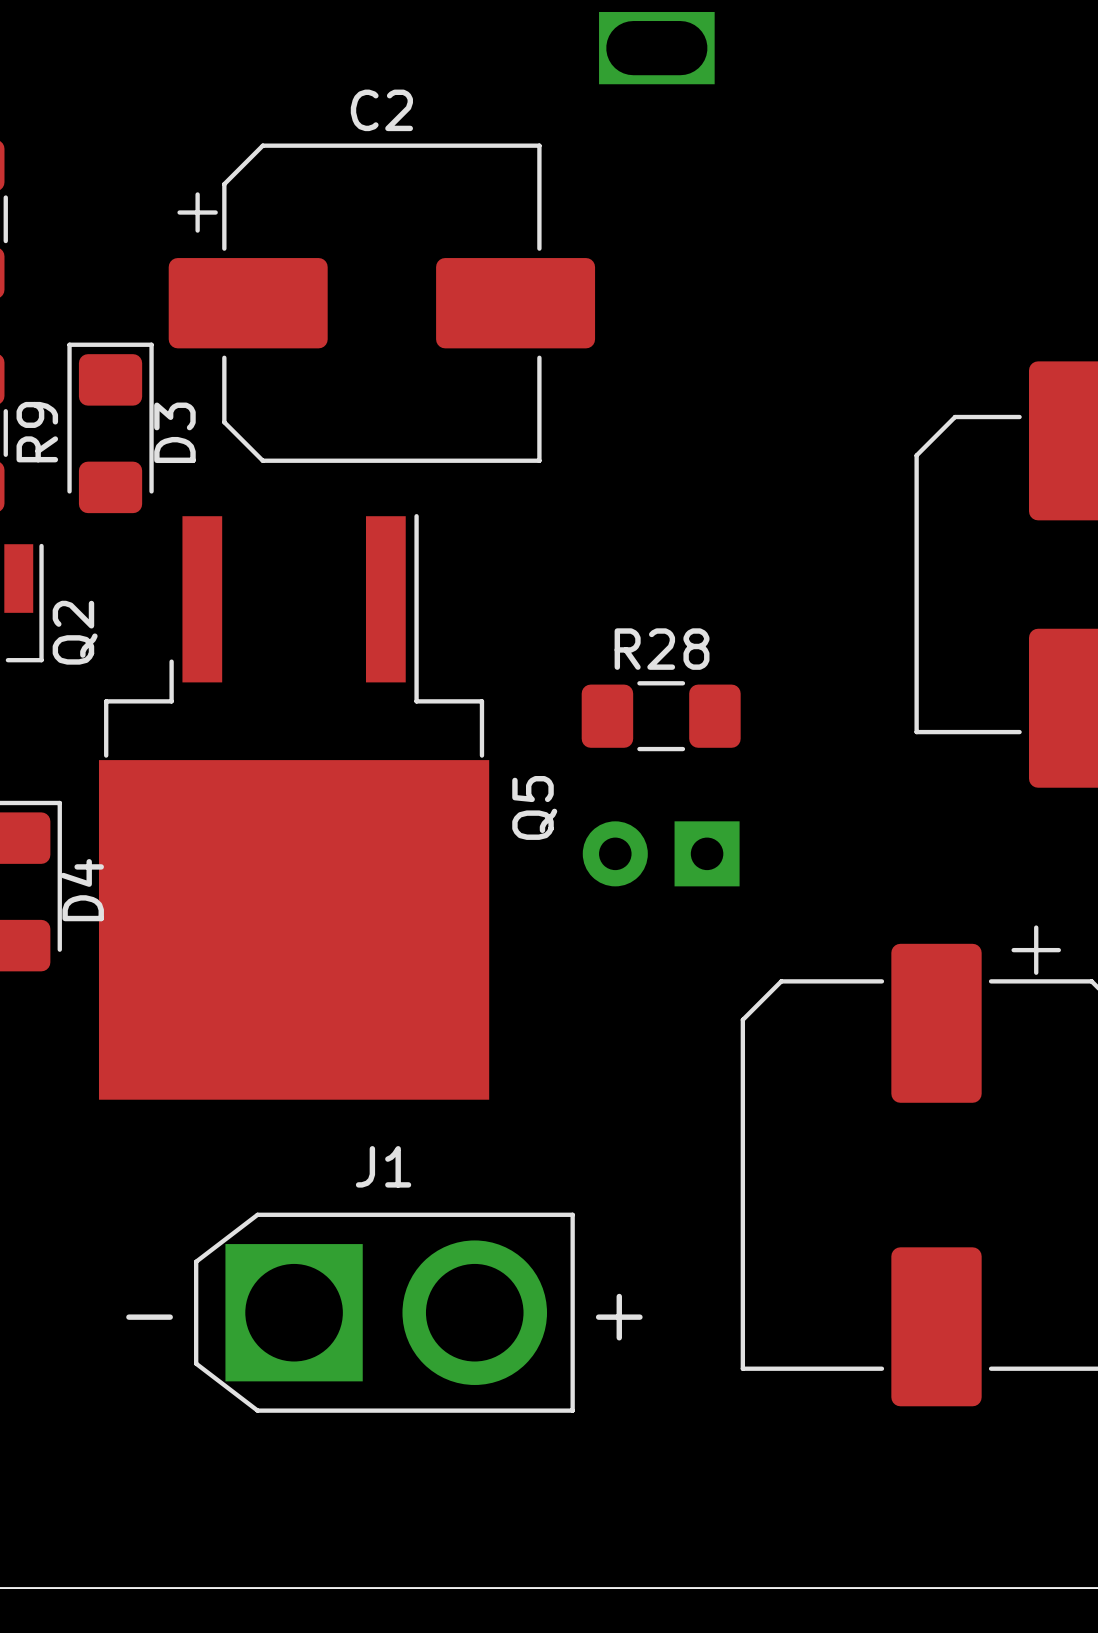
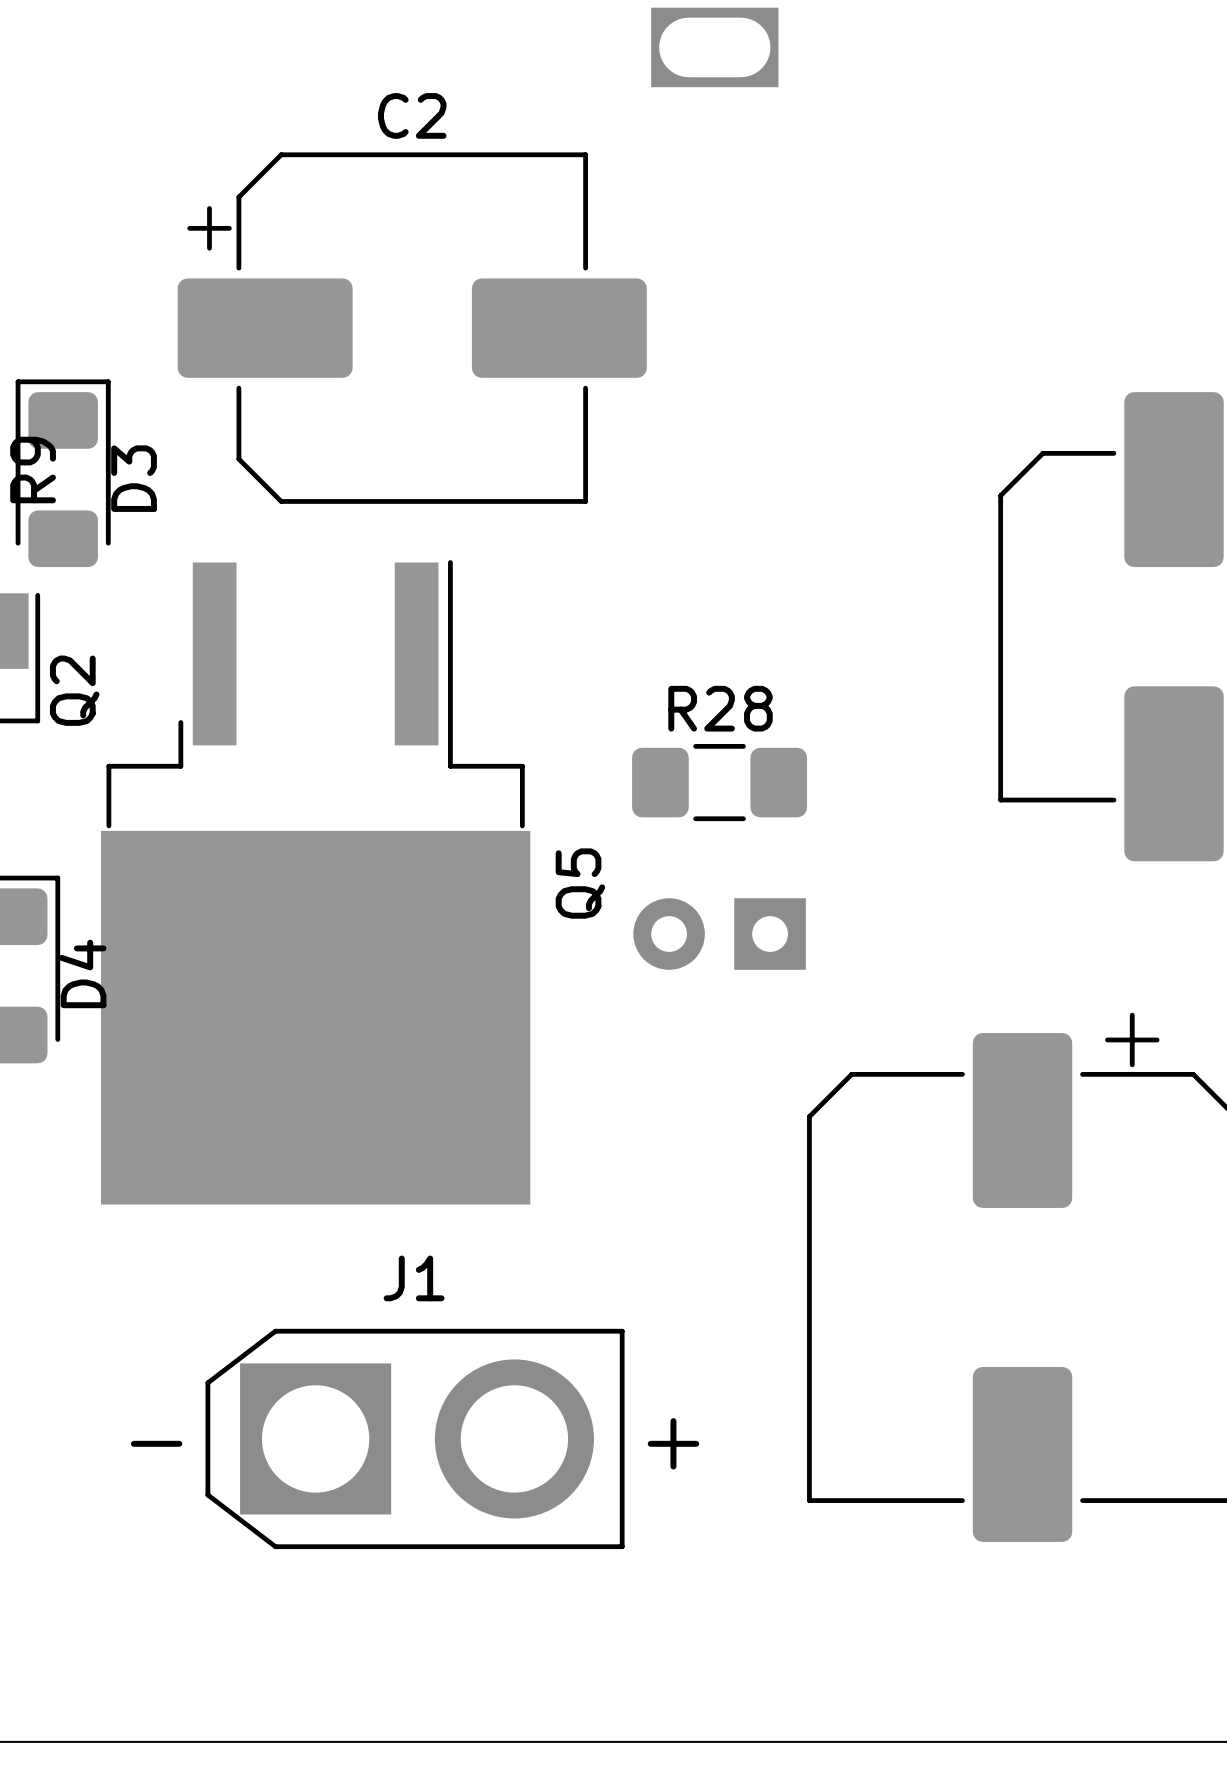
D3 position: (110, 427) -> (63, 473)

